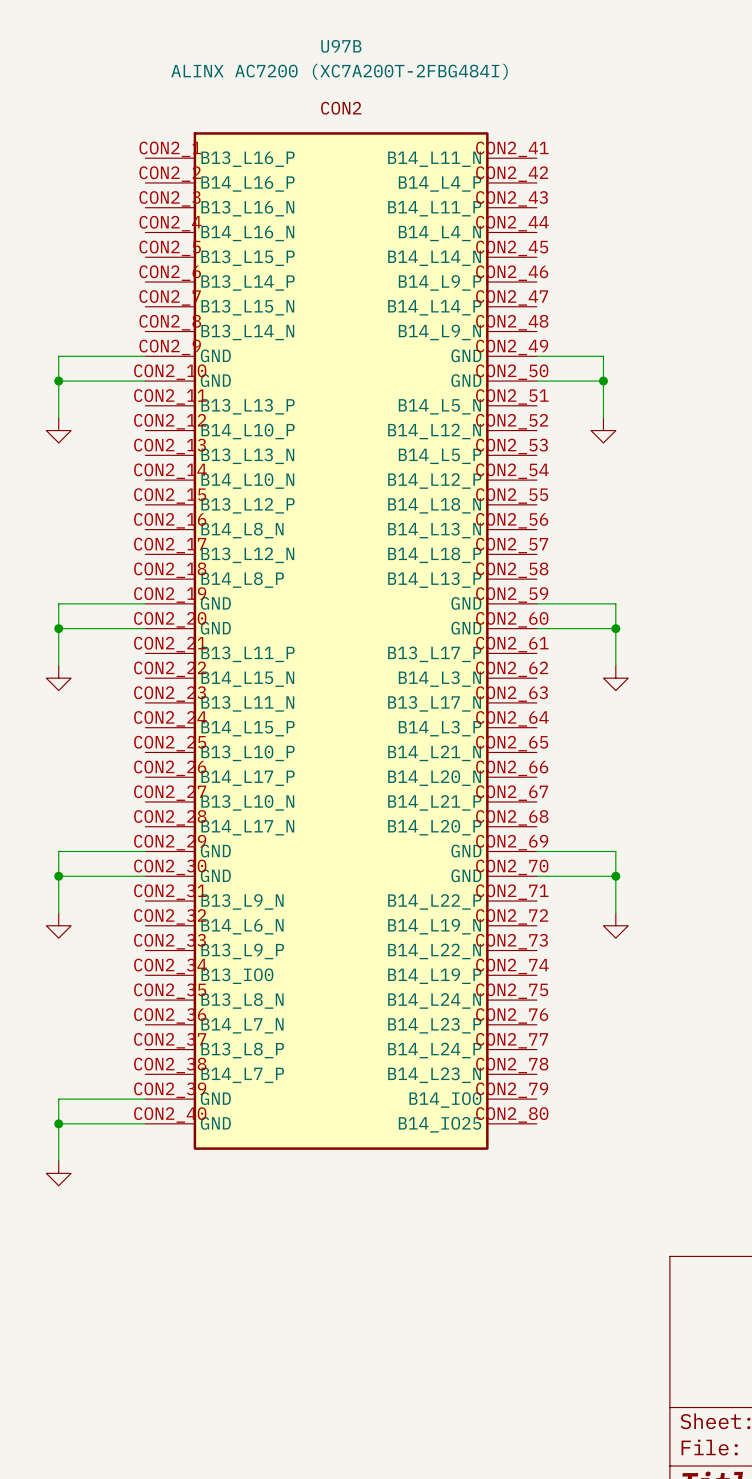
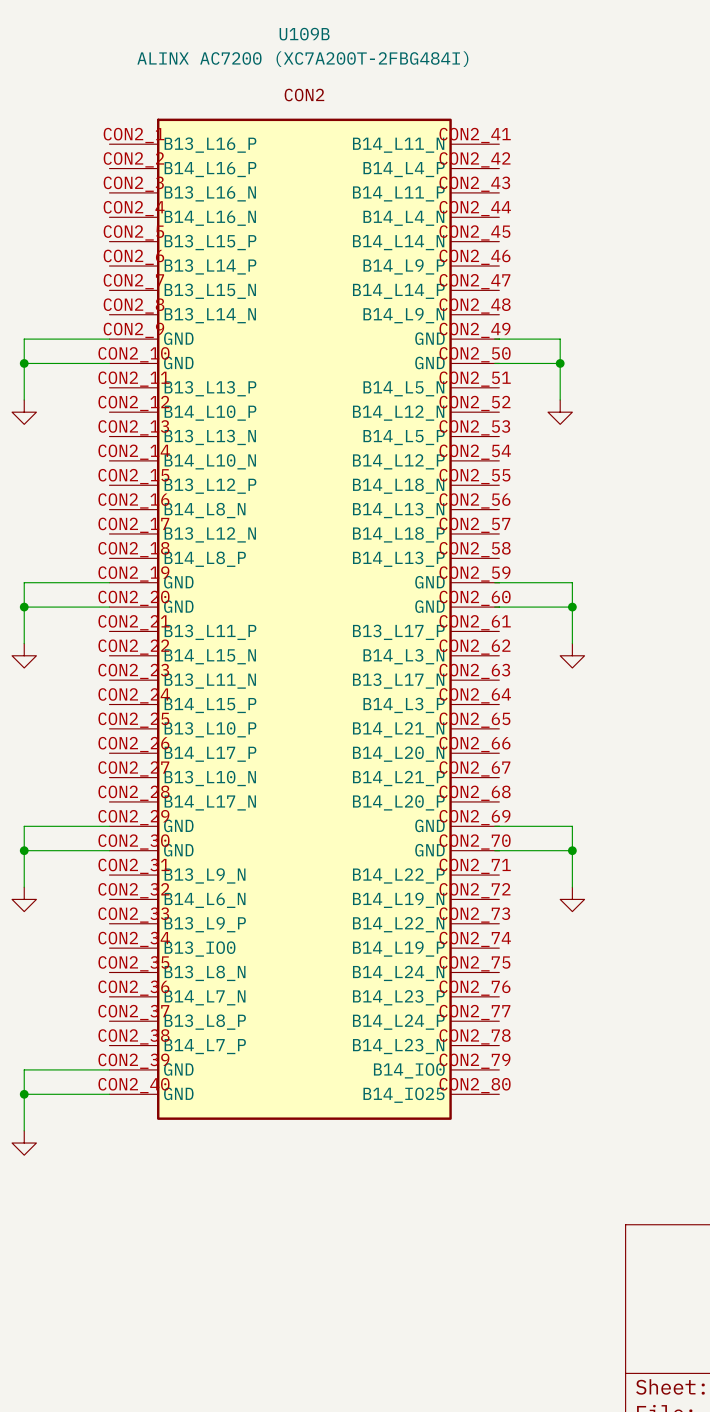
U97B: ALINX AC7200 (XC7A200T-2FBG484I) (341, 641) -> none
U109B: none -> ALINX AC7200 (XC7A200T-2FBG484I) (304, 619)

